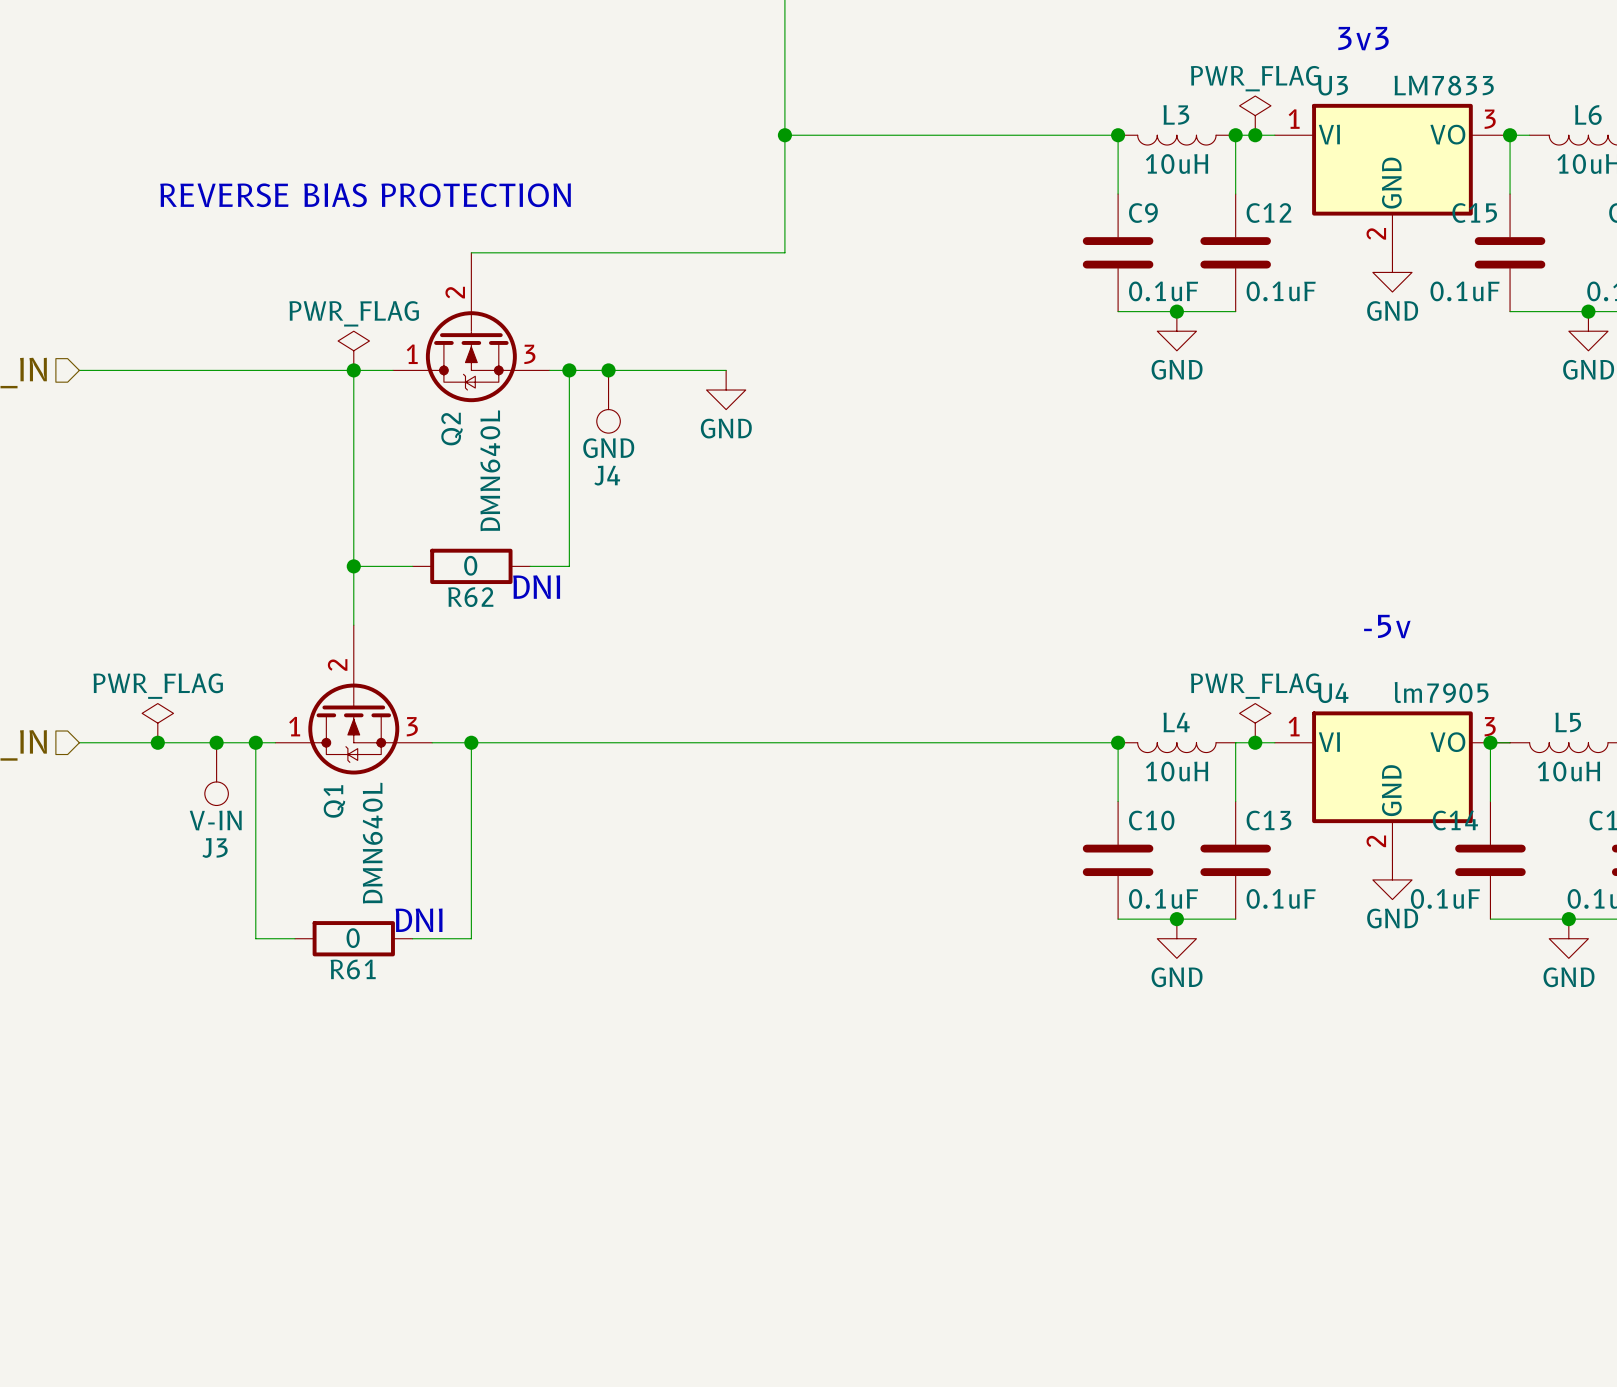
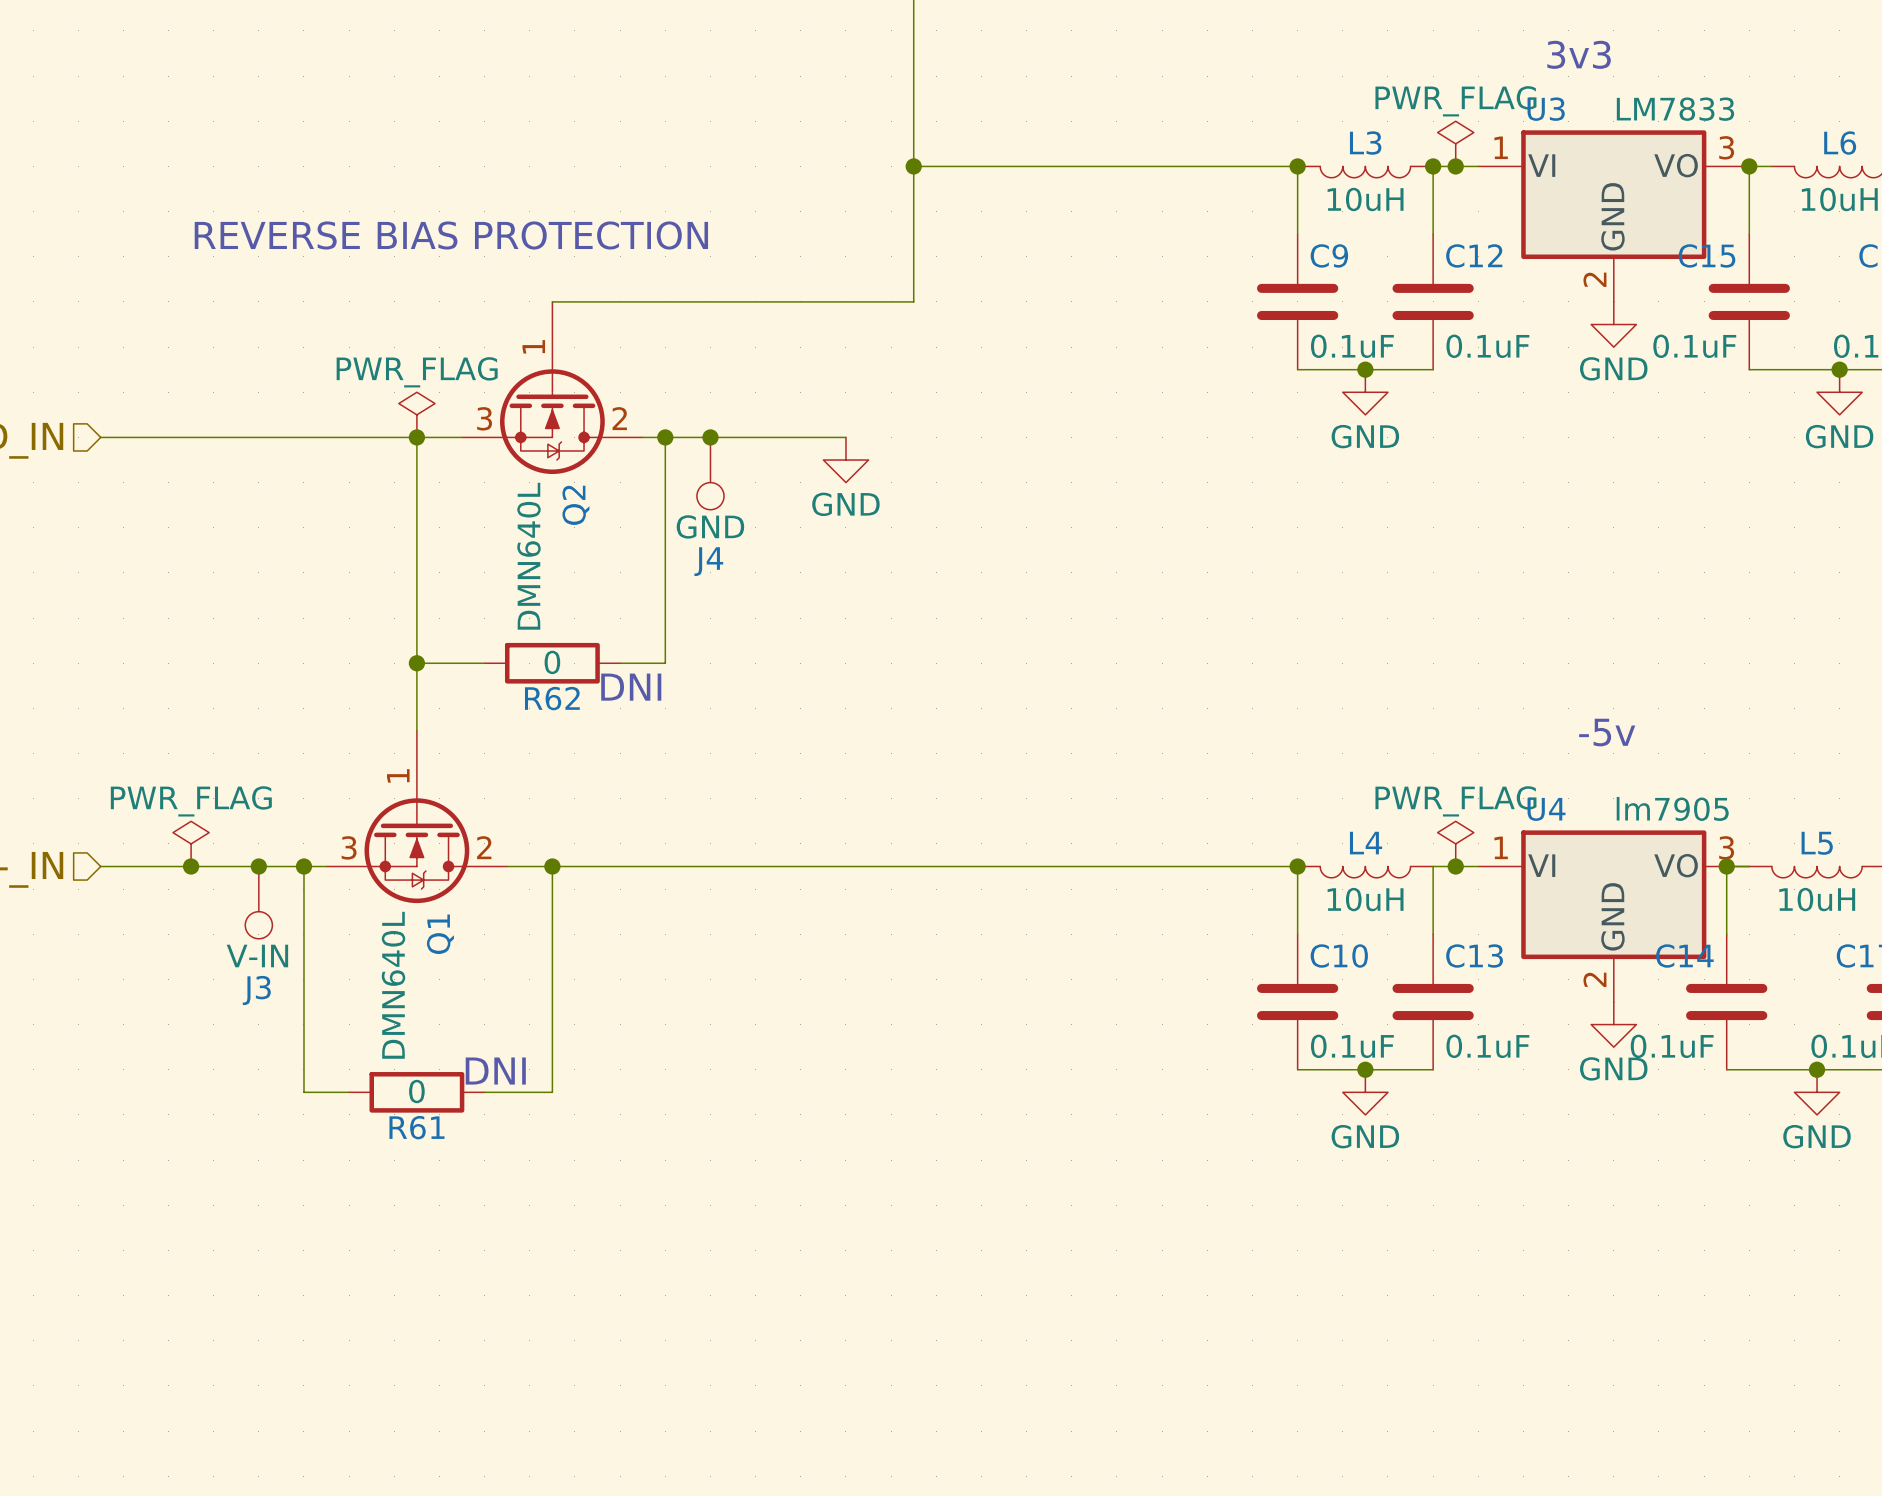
Q2 symbol: [392, 252, 550, 403] -> [462, 301, 643, 475]
Q2 name position: Q2 (451, 429) -> Q2 (575, 505)
Q2 value position: DMN640L (490, 470) -> DMN640L (528, 556)
Q1 symbol: [275, 625, 433, 775] -> [326, 731, 508, 904]
Q1 name position: Q1 (334, 801) -> Q1 (440, 934)
Q1 value position: DMN640L (372, 843) -> DMN640L (393, 985)

